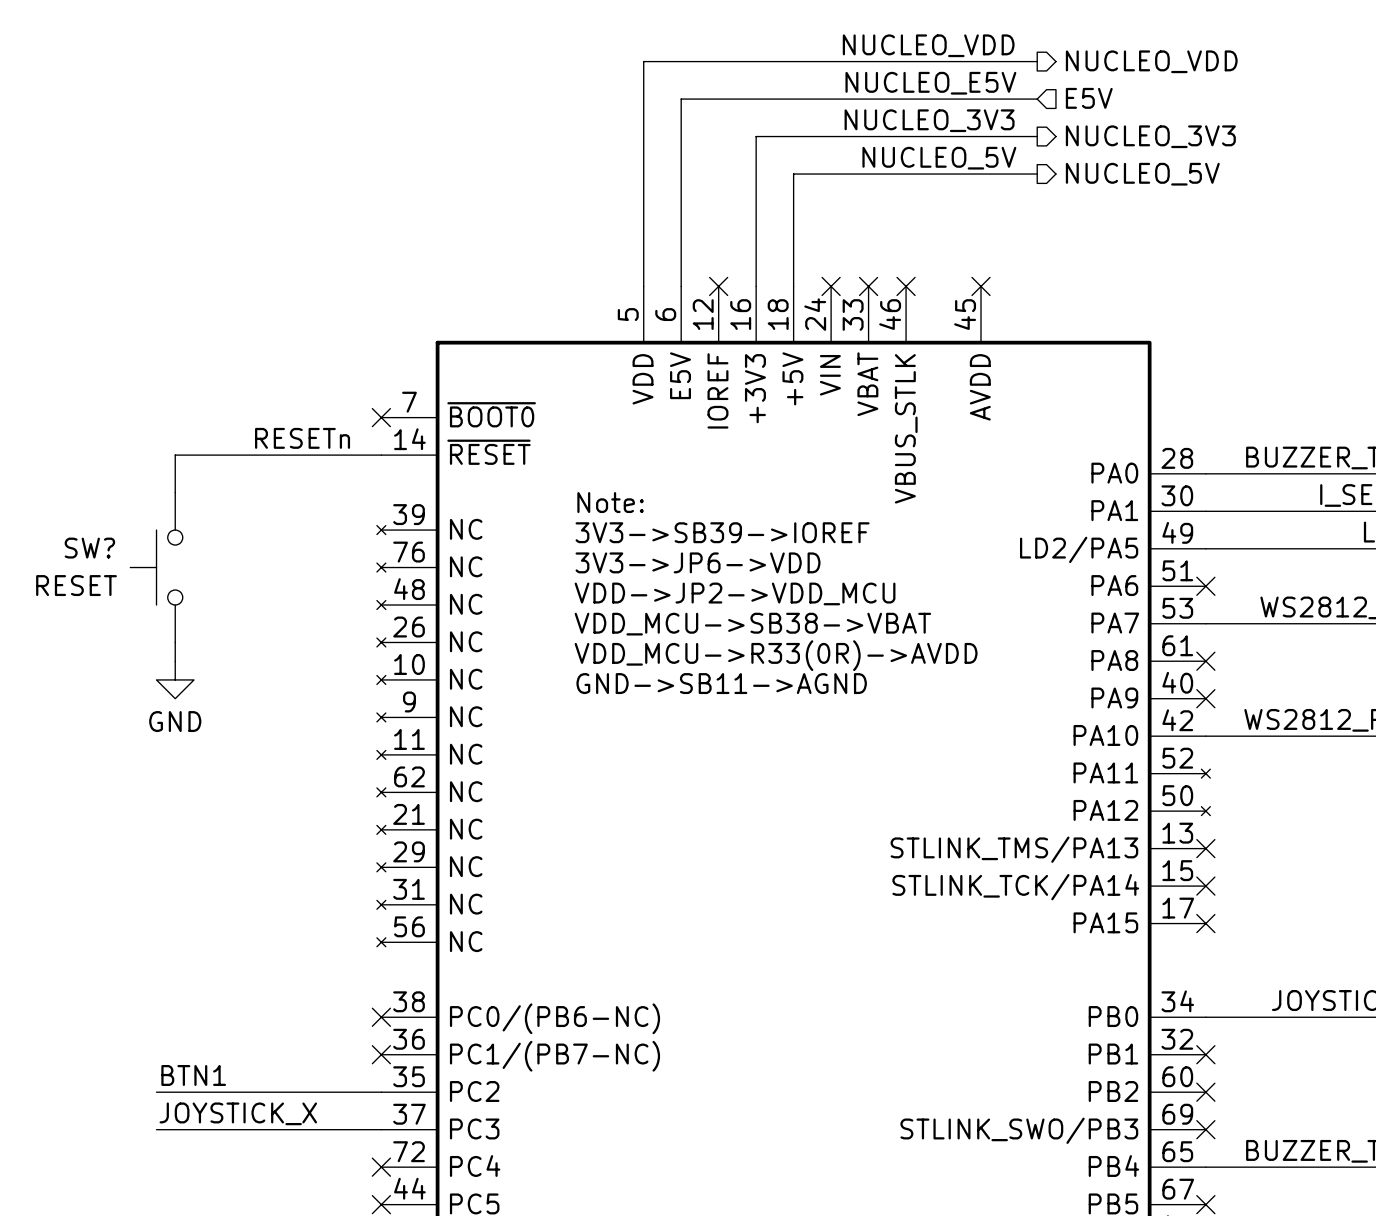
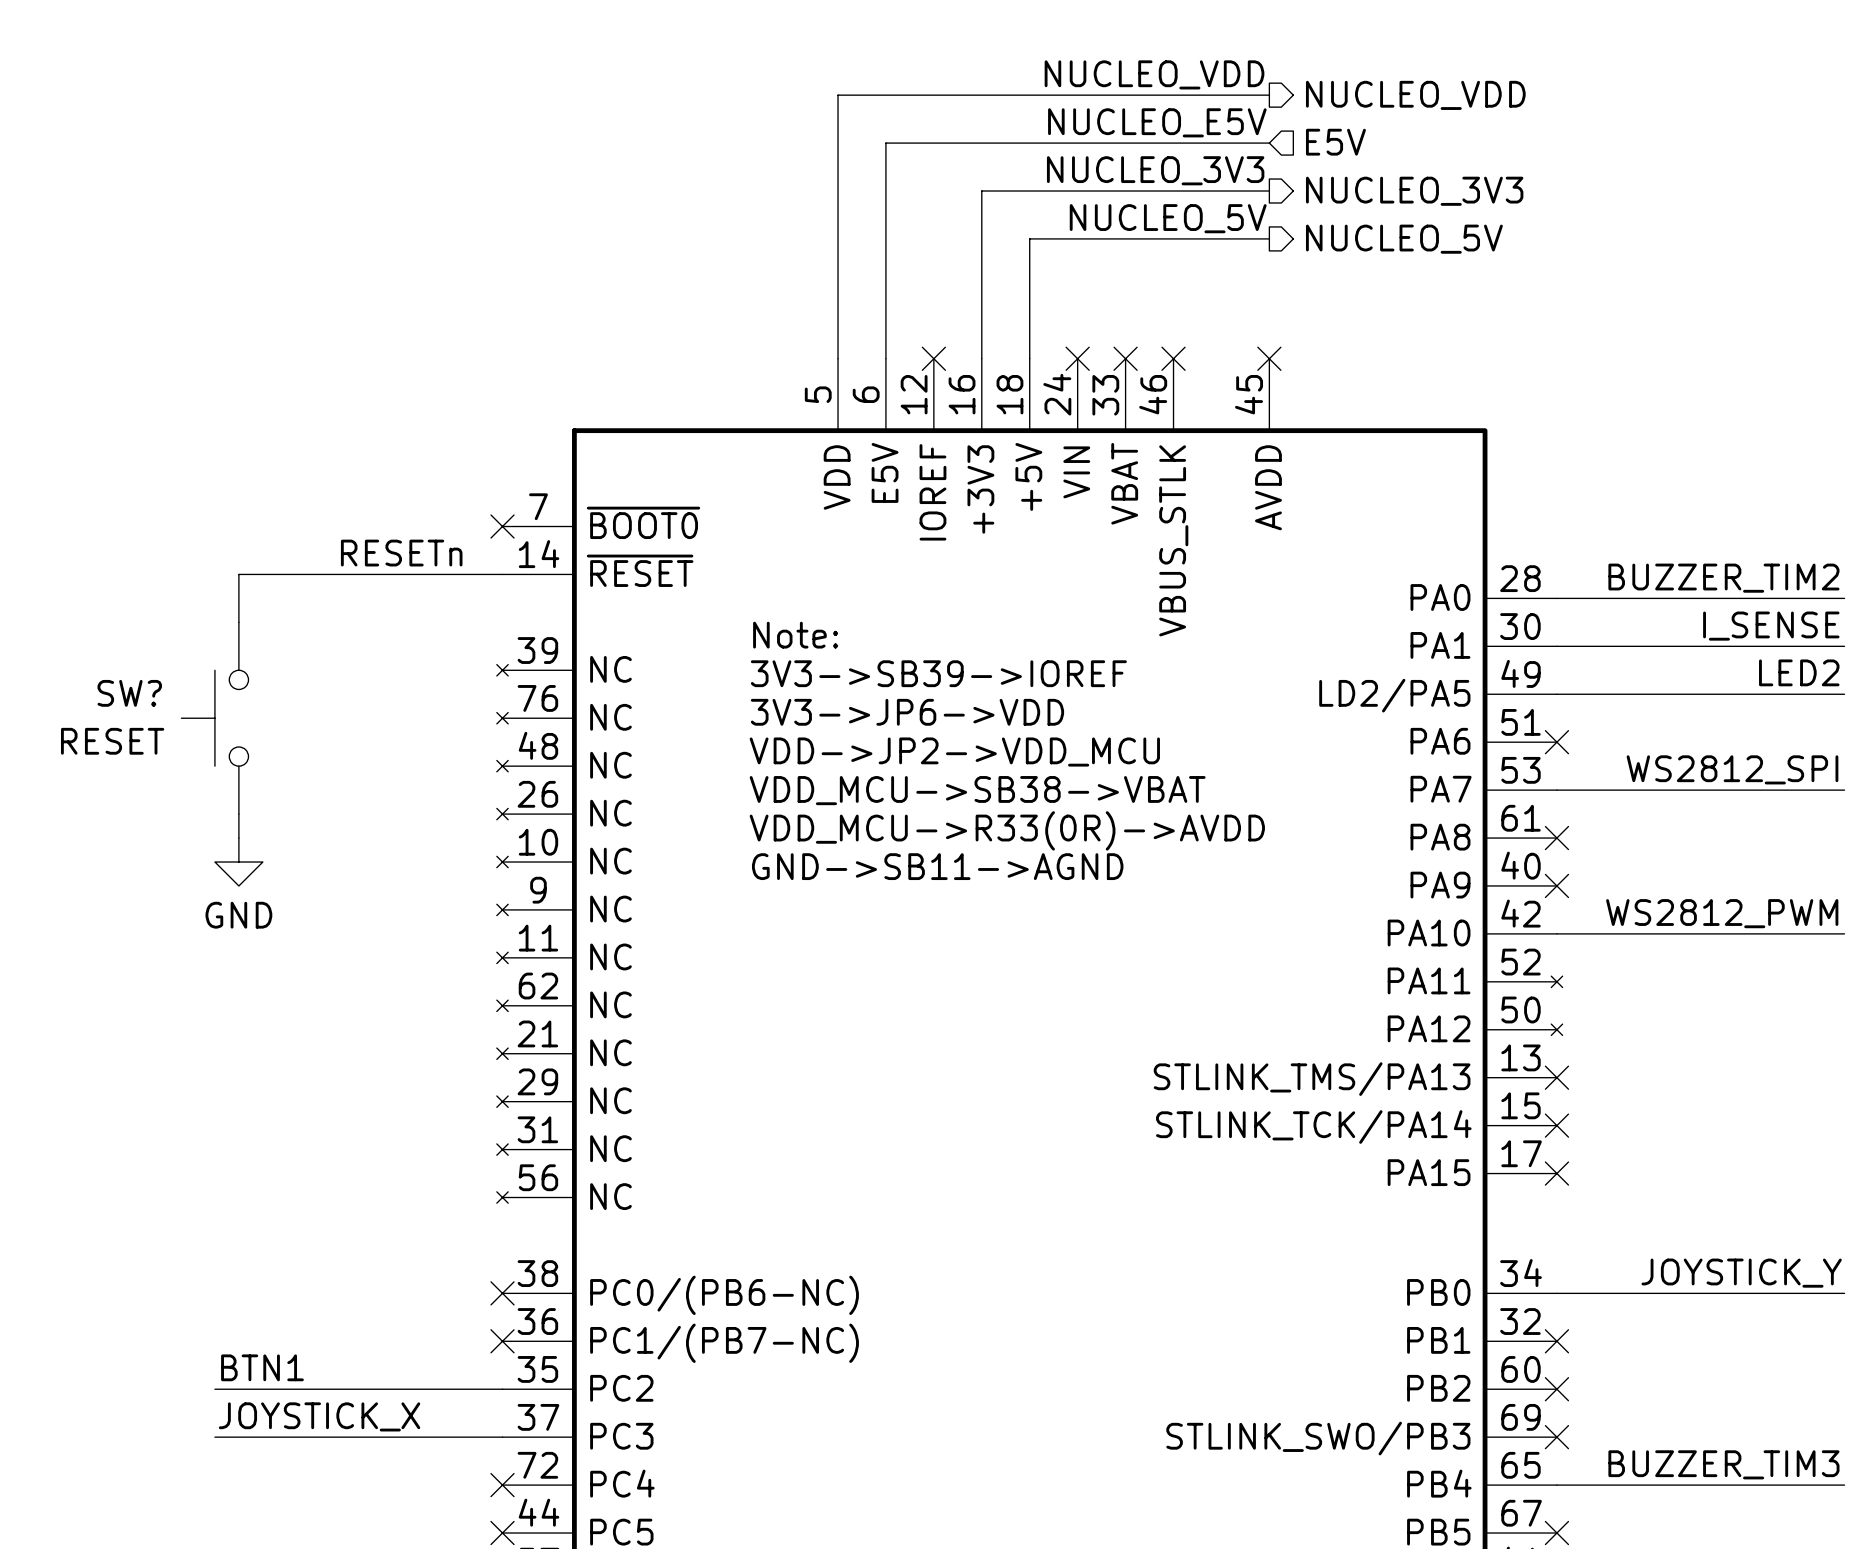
label position: NUCLEO_VDD (928, 45) -> NUCLEO_VDD (1154, 74)
wire: (1037, 61) (643, 61) (643, 80) -> (1269, 95) (838, 95)
hierarchical label position: NUCLEO_VDD (1151, 61) -> NUCLEO_VDD (1415, 95)
label position: NUCLEO_E5V (930, 83) -> NUCLEO_E5V (1157, 122)
hierarchical label position: E5V (1089, 98) -> E5V (1335, 142)
wire: (1037, 99) (681, 99) (681, 117) -> (1269, 143) (885, 143)
label position: NUCLEO_3V3 (929, 120) -> NUCLEO_3V3 (1155, 170)
wire: (1037, 136) (756, 136) (756, 155) -> (1269, 191) (981, 191)
hierarchical label position: NUCLEO_3V3 (1150, 136) -> NUCLEO_3V3 (1414, 191)
label position: NUCLEO_5V (939, 158) -> NUCLEO_5V (1168, 218)
wire: (1037, 174) (793, 174) (793, 192) -> (1269, 238) (1029, 238)
hierarchical label position: NUCLEO_5V (1142, 174) -> NUCLEO_5V (1404, 239)

